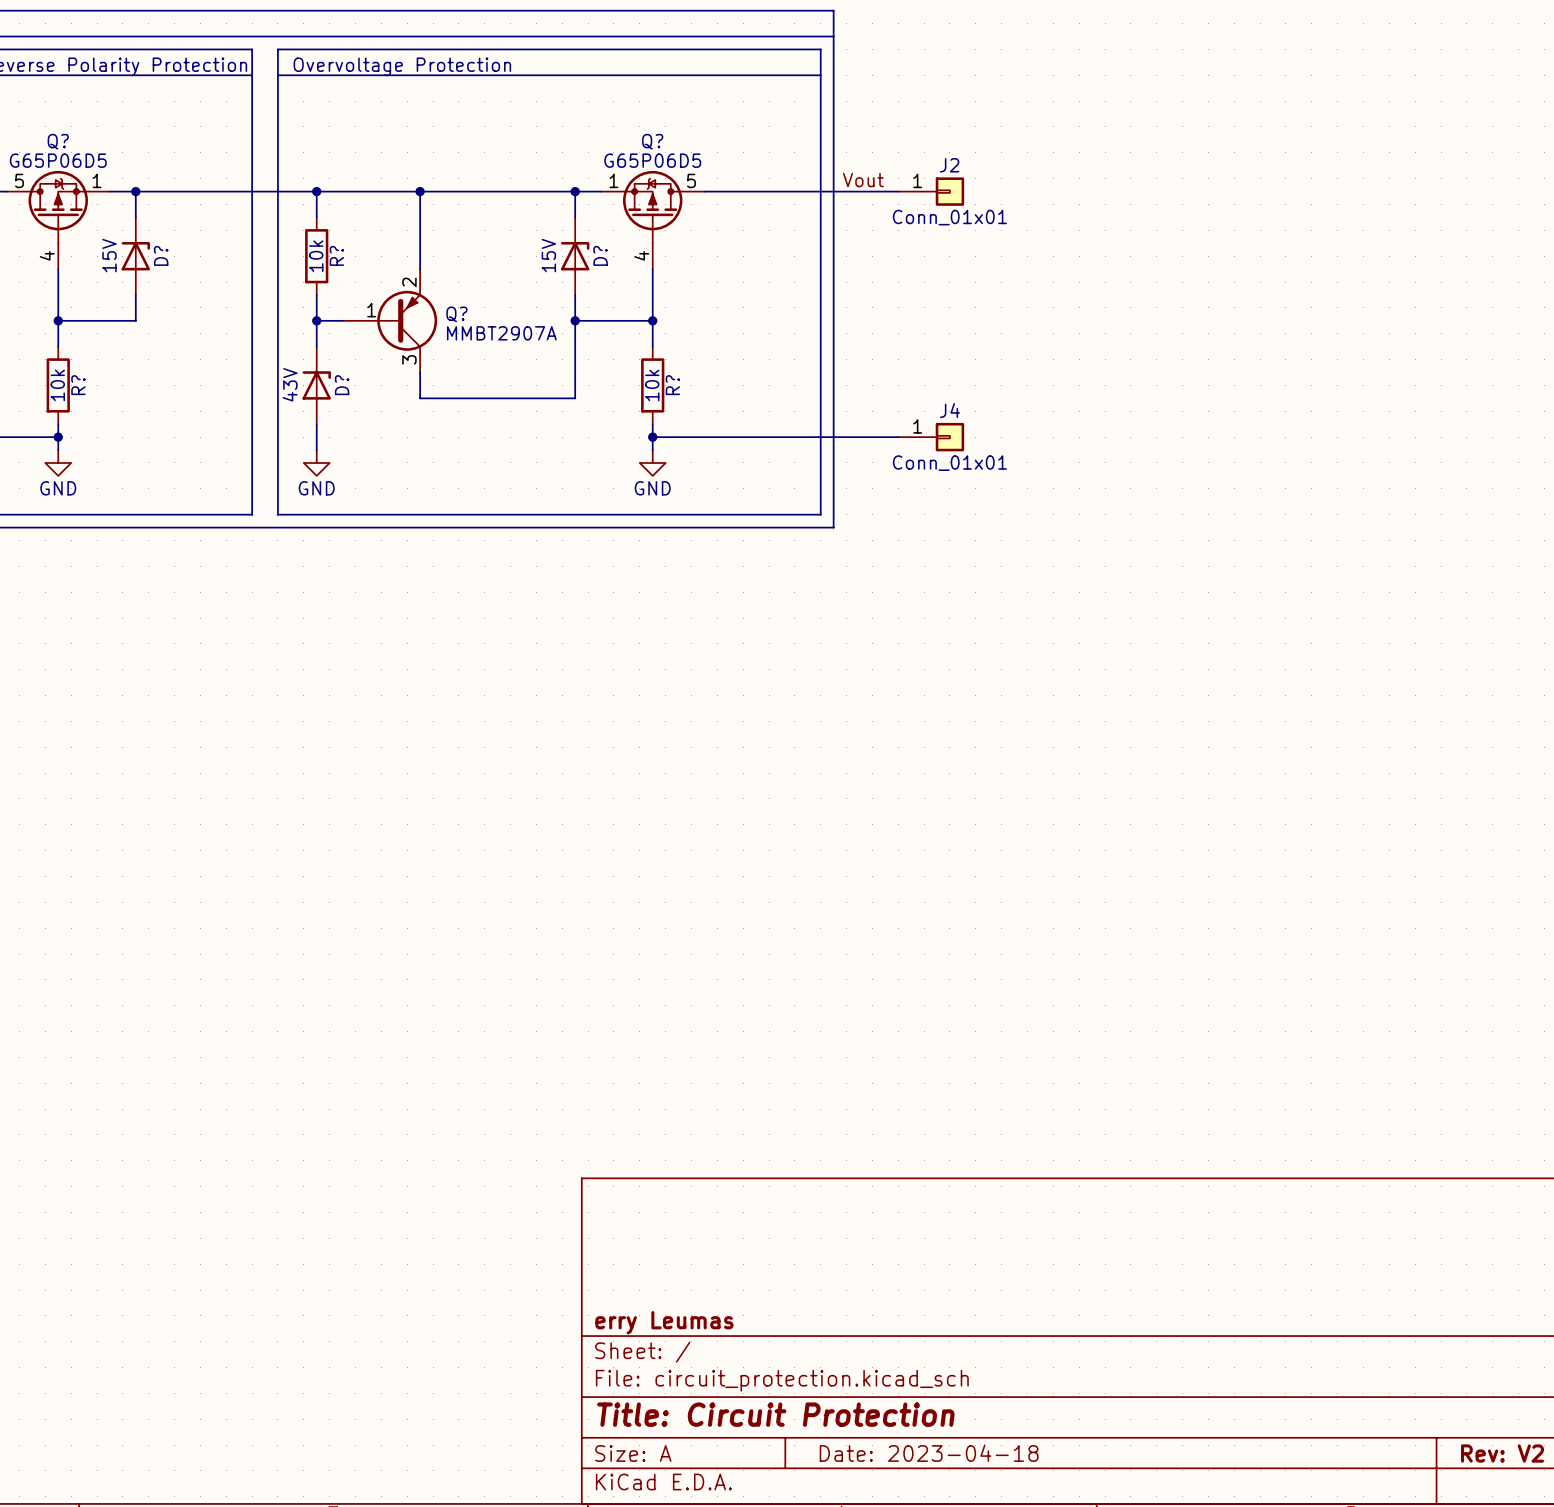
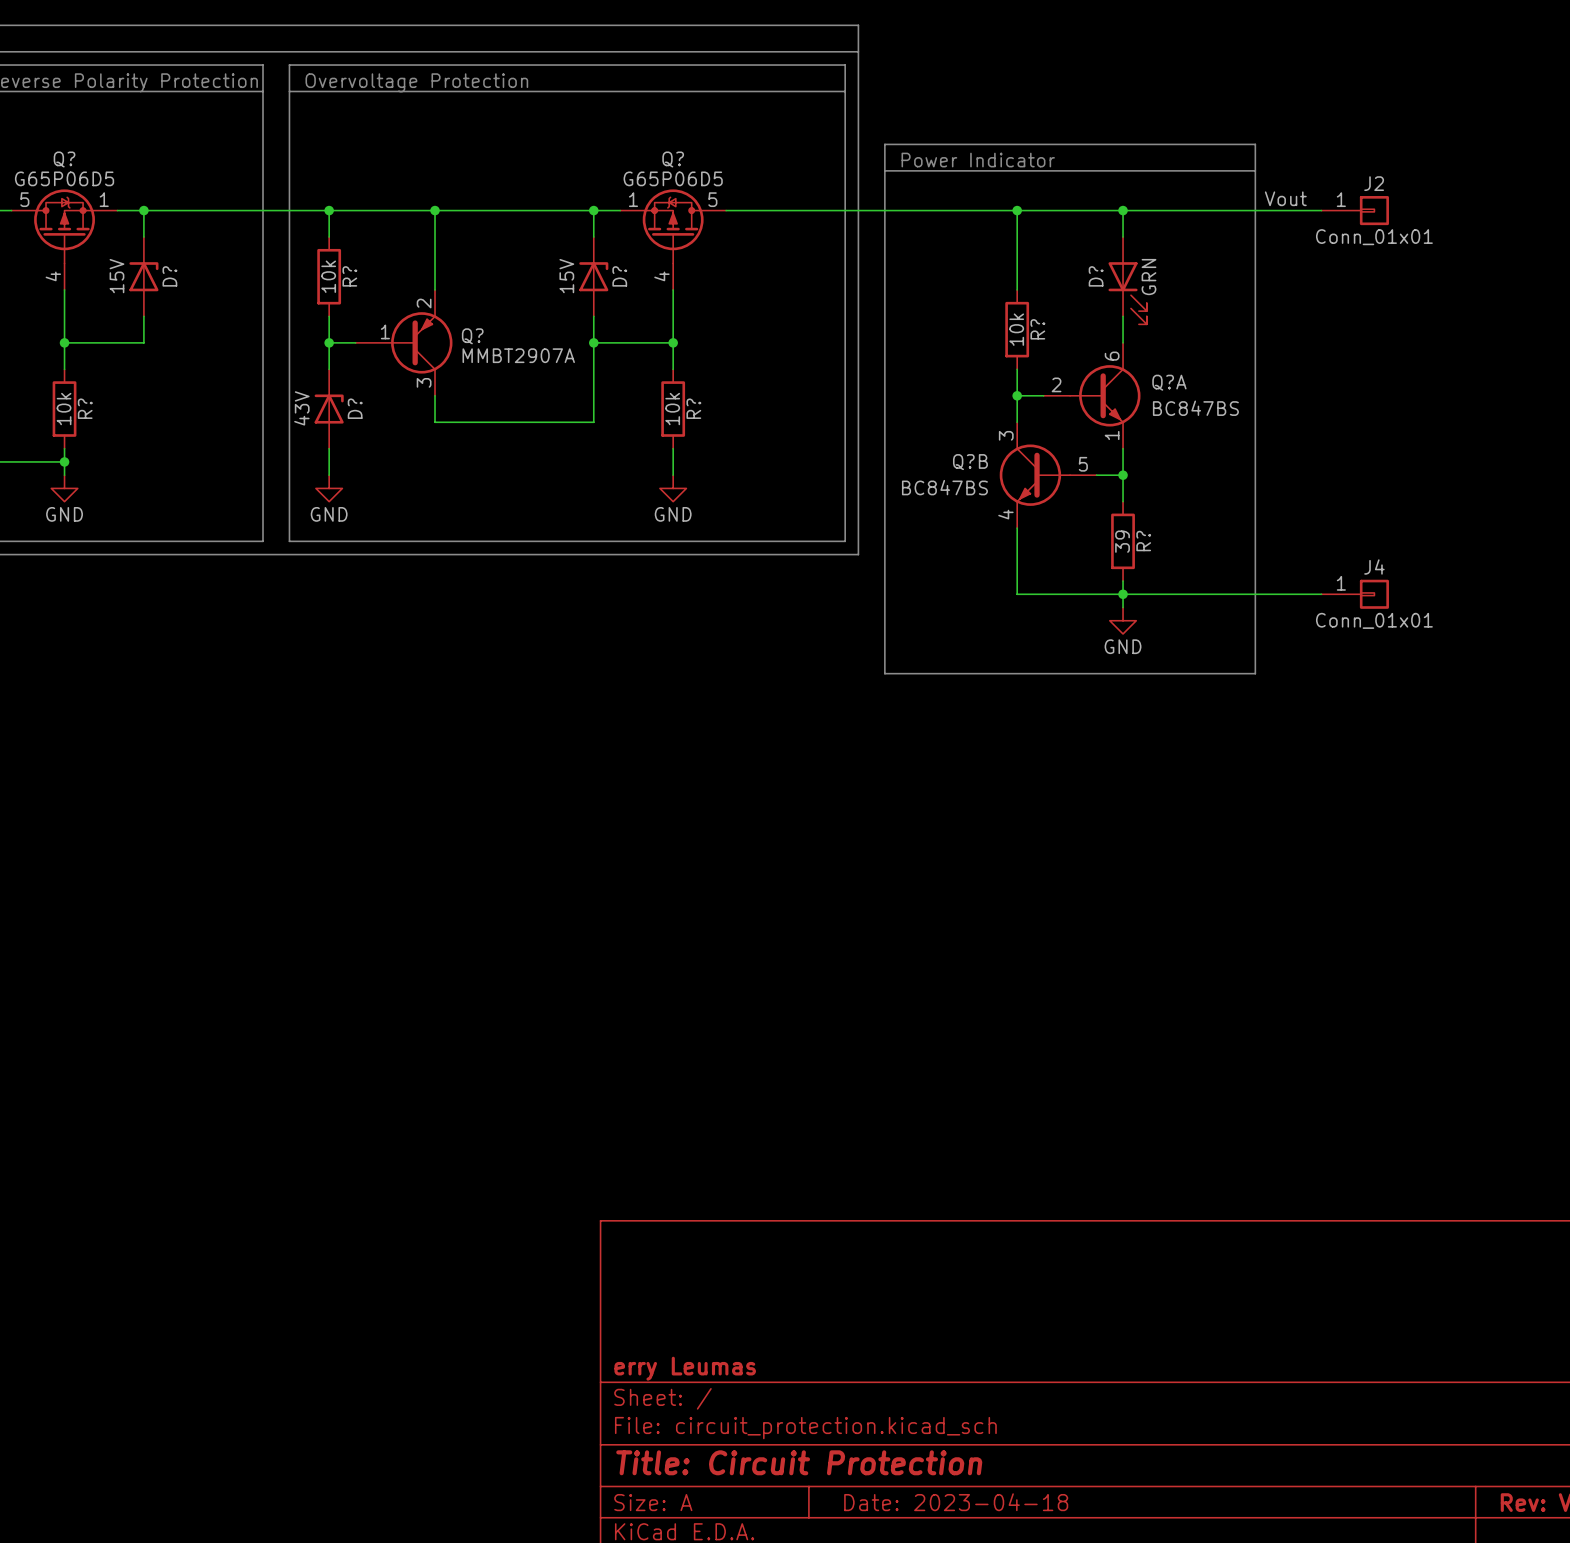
line: none -> (884, 144) (1255, 144) (1255, 673) (884, 673) (884, 144)
text: none -> Power Indicator (978, 160)
line: none -> (884, 170) (1255, 170)
label: Vout (863, 180) -> none
label: none -> Vout (1285, 198)
wire: none -> (924, 210) (1321, 210)
J2 position: (931, 191) -> (1355, 210)
wire: none -> (1017, 210) (1017, 289)
junction: none -> (1017, 210)
wire: none -> (1123, 210) (1123, 237)
junction: none -> (1123, 210)
D?: none -> GRN (1127, 280)
wire: none -> (1123, 316) (1123, 342)
R?: none -> 10k (1017, 329)
wire: none -> (1017, 369) (1017, 422)
wire: none -> (1017, 395) (1043, 395)
junction: none -> (1017, 395)
Q?A: none -> BC847BS (1092, 395)
wire: none -> (1123, 448) (1123, 501)
wire: (652, 437) (898, 437) -> none
junction: (652, 437) -> none
J4 position: (931, 437) -> (1355, 594)
Q?B: none -> BC847BS (1048, 475)
wire: none -> (1096, 475) (1123, 475)
junction: none -> (1123, 475)
wire: none -> (1017, 528) (1017, 594) (1321, 594)
R?: none -> 39 (1123, 541)
wire: none -> (1123, 581) (1123, 607)
junction: none -> (1123, 594)
power symbol: none -> GND (1123, 620)

